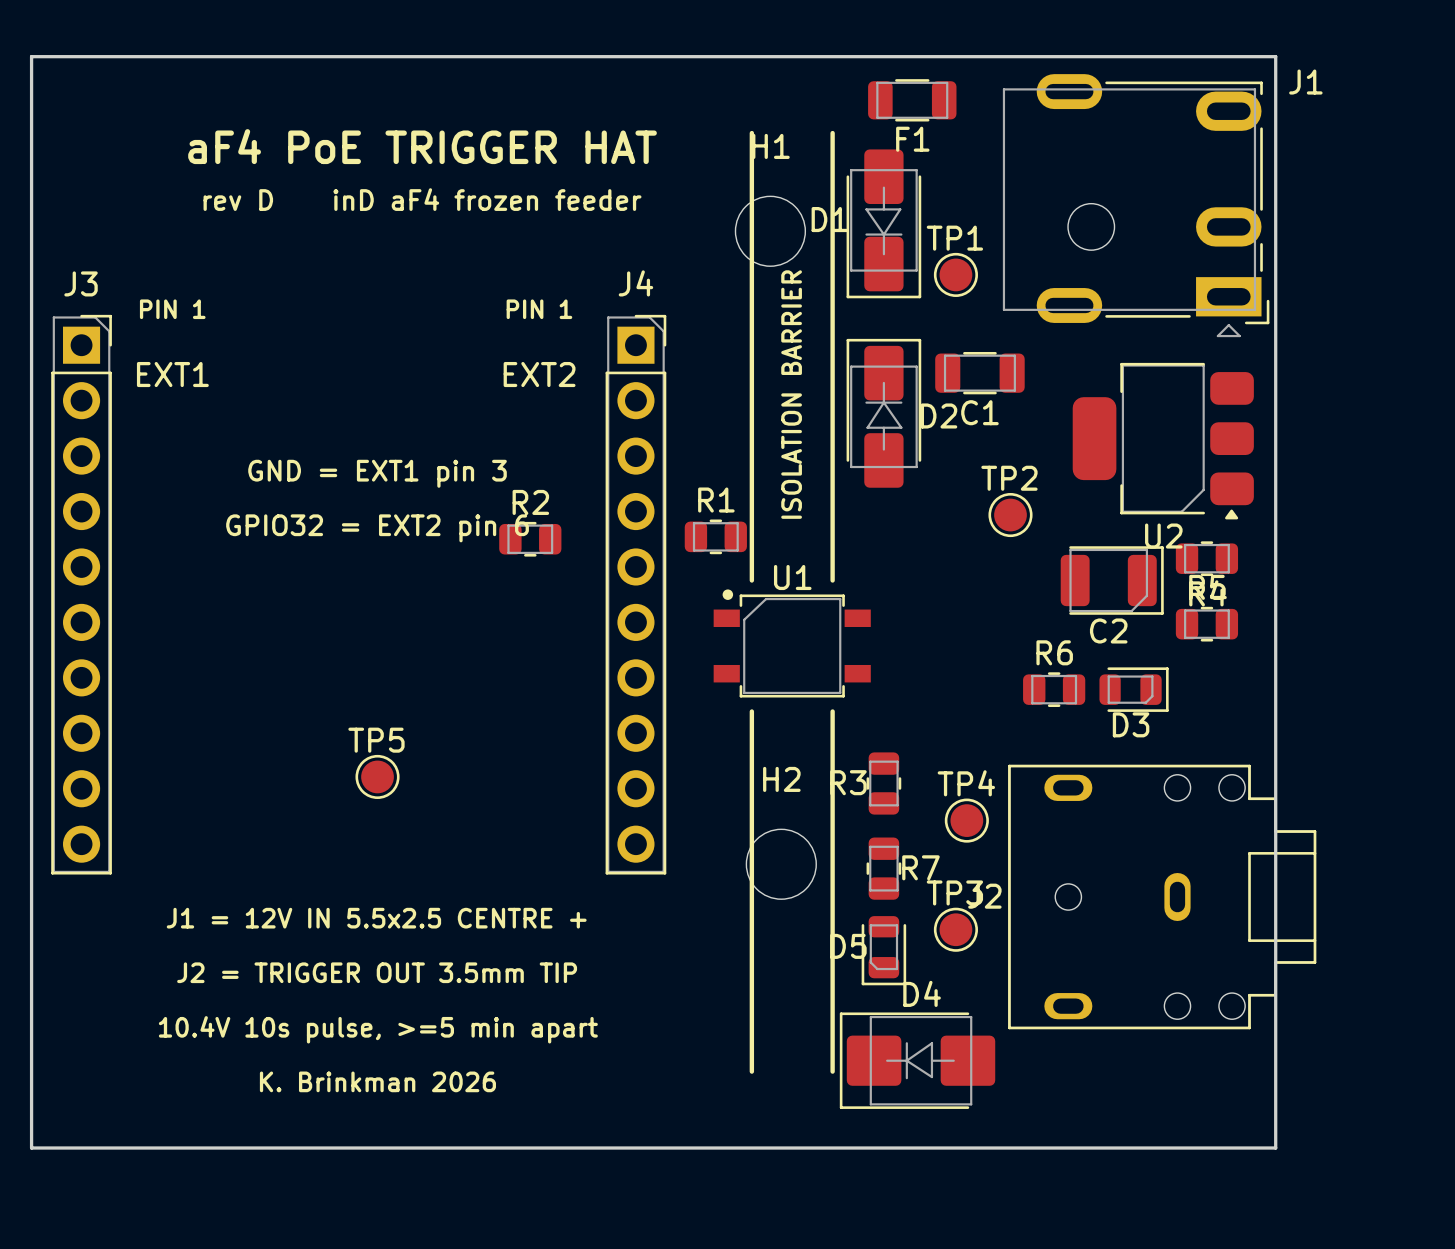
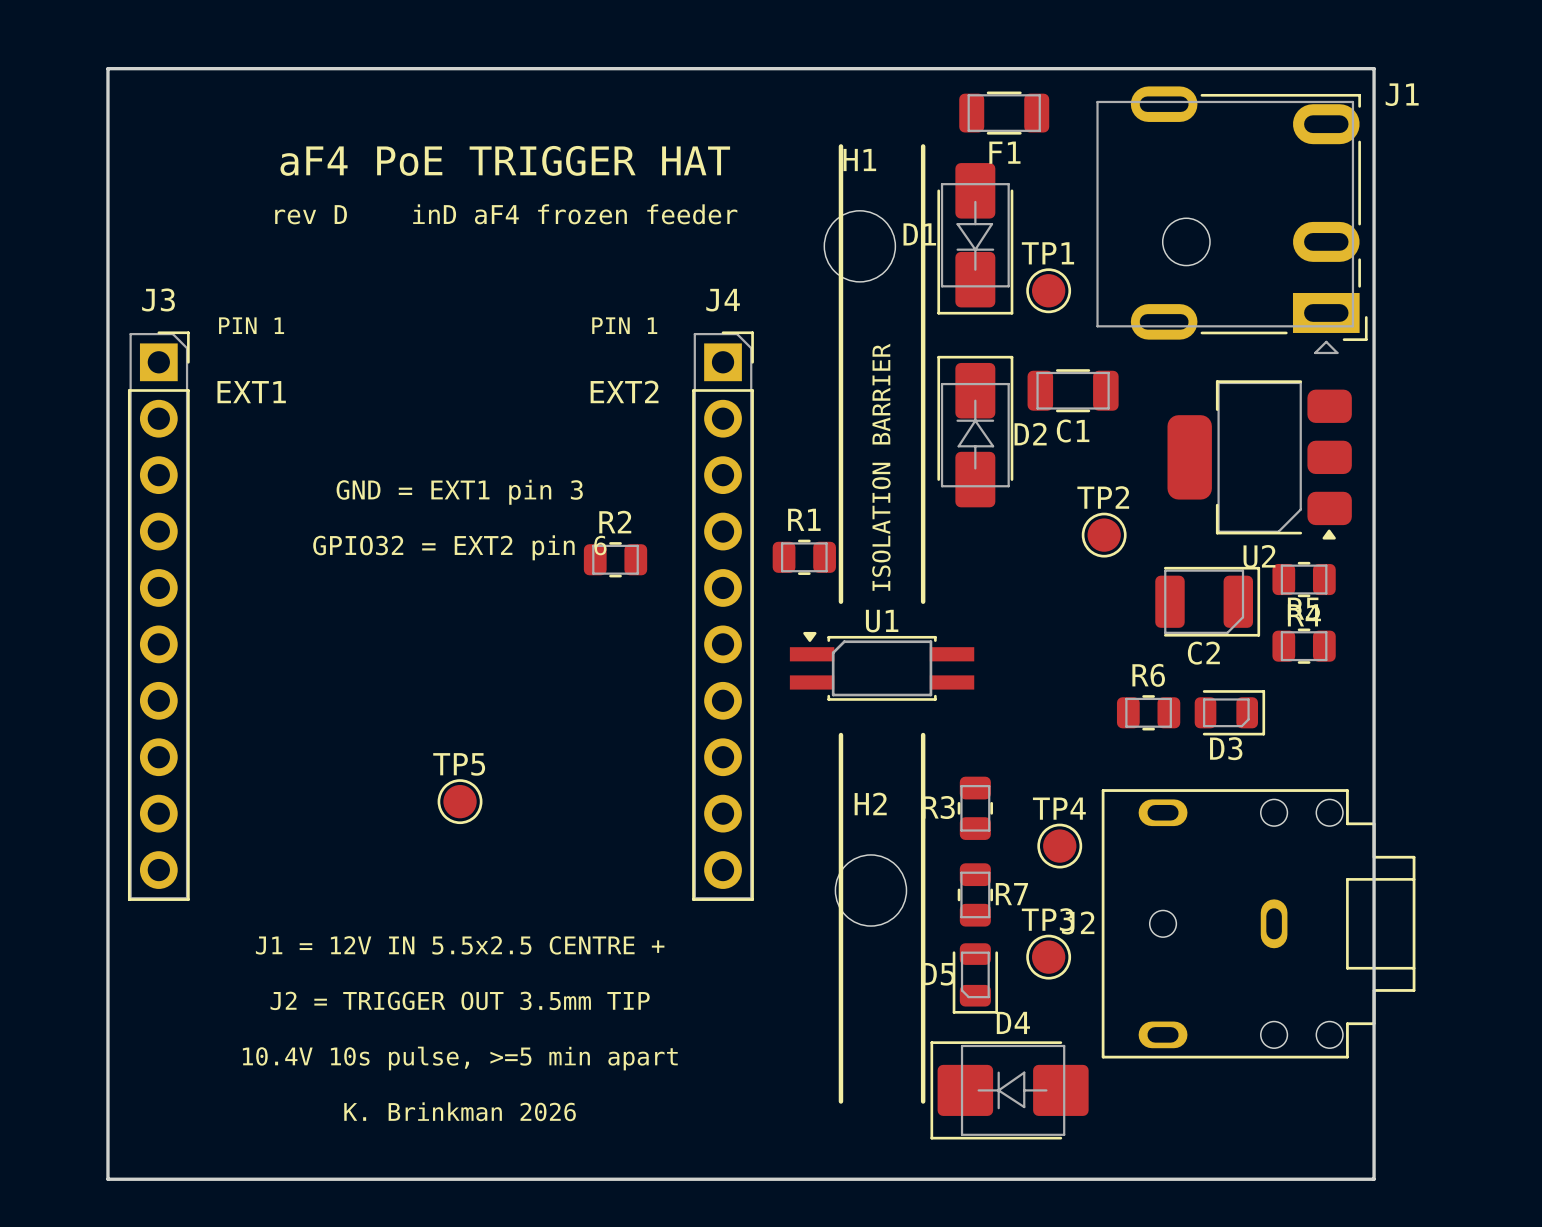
text position: ISOLATION BARRIER (791, 394) -> ISOLATION BARRIER (881, 467)
U1 footprint: [713, 589, 871, 698] -> [789, 631, 975, 701]

